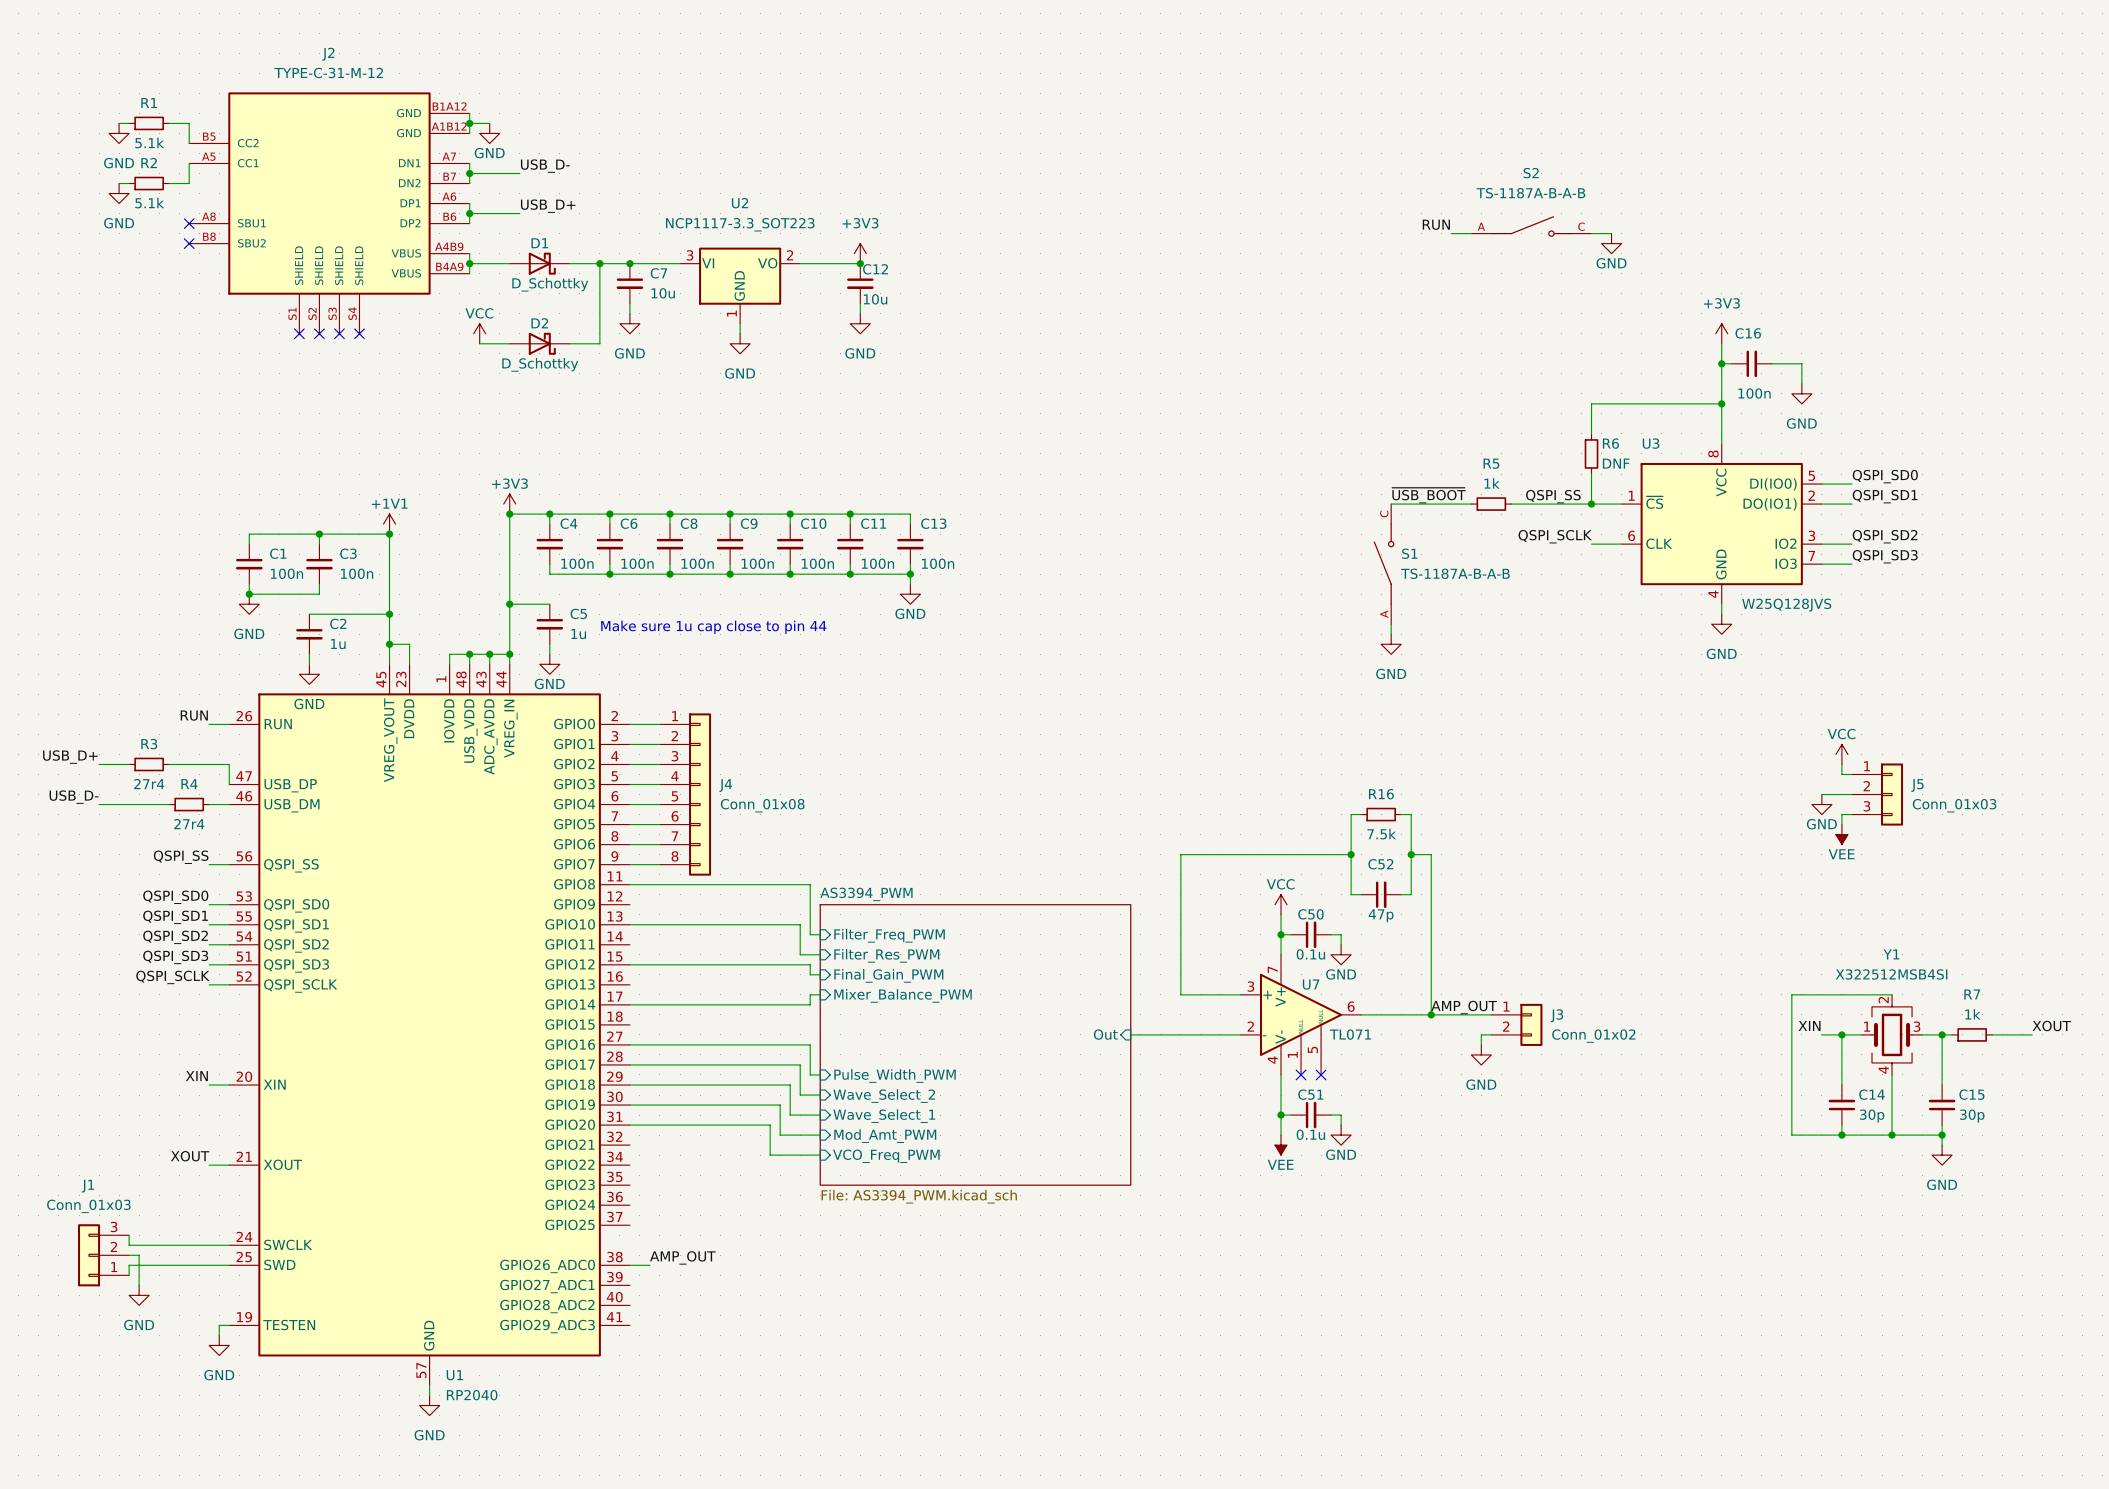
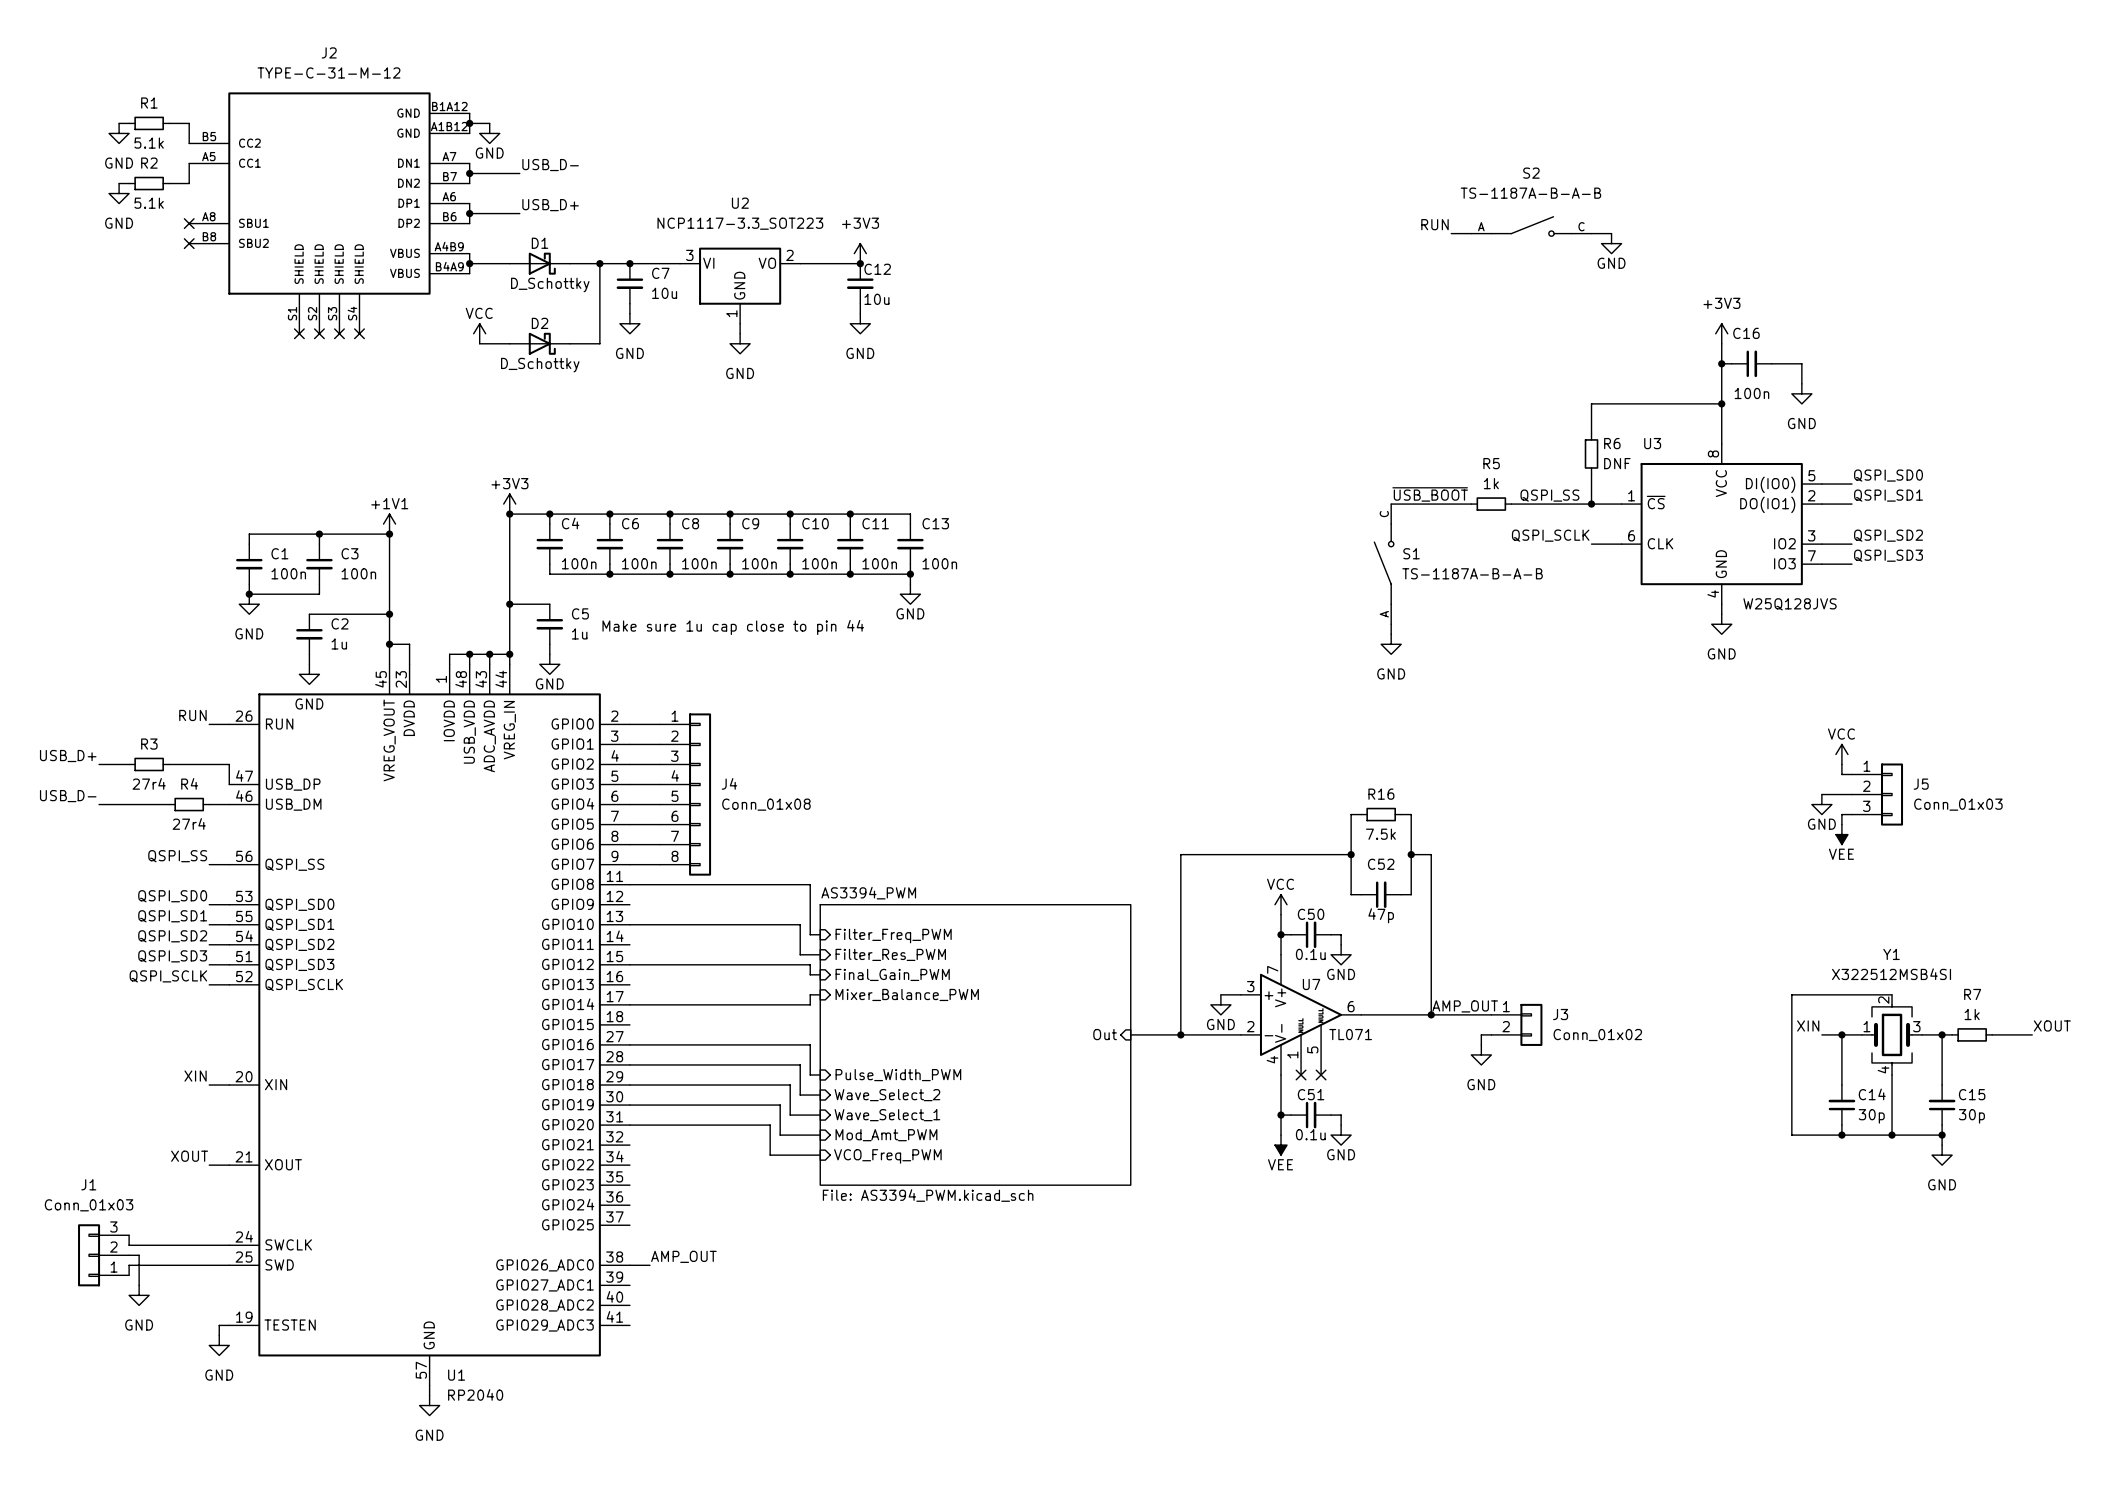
wire: (1180, 994) (1220, 994) -> (1180, 994) (1180, 1034)
power symbol: none -> GND (1220, 1004)
junction: none -> (1180, 1034)

